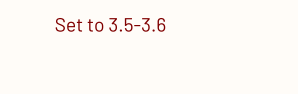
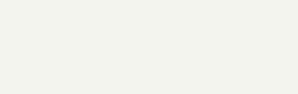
label: Set to 3.5-3.6 (110, 24) -> none

